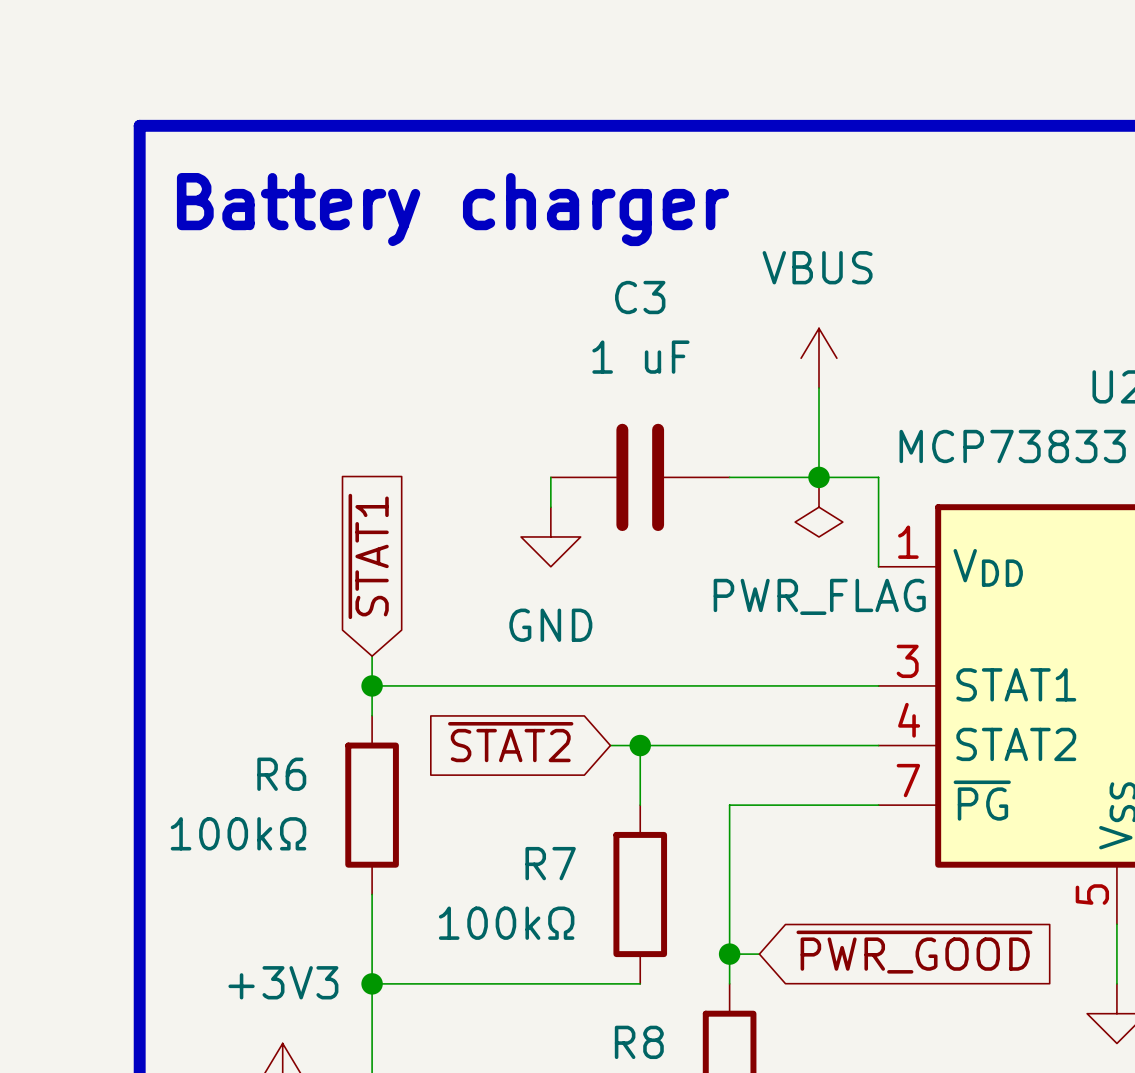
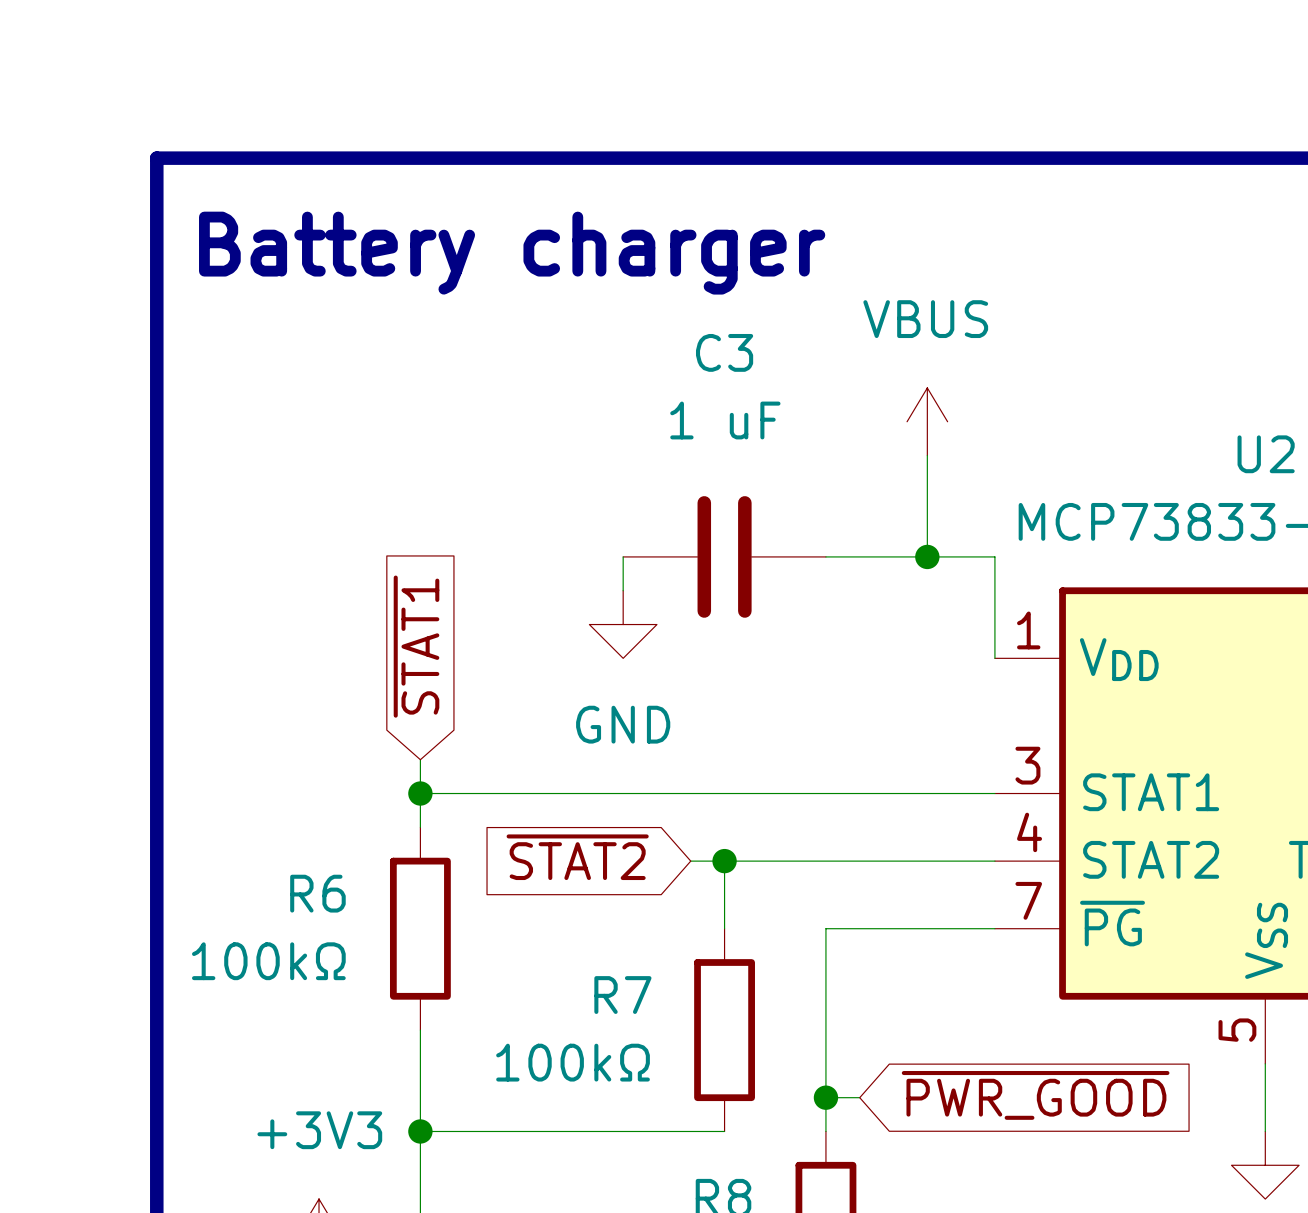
power symbol: PWR_FLAG (819, 507) -> none

